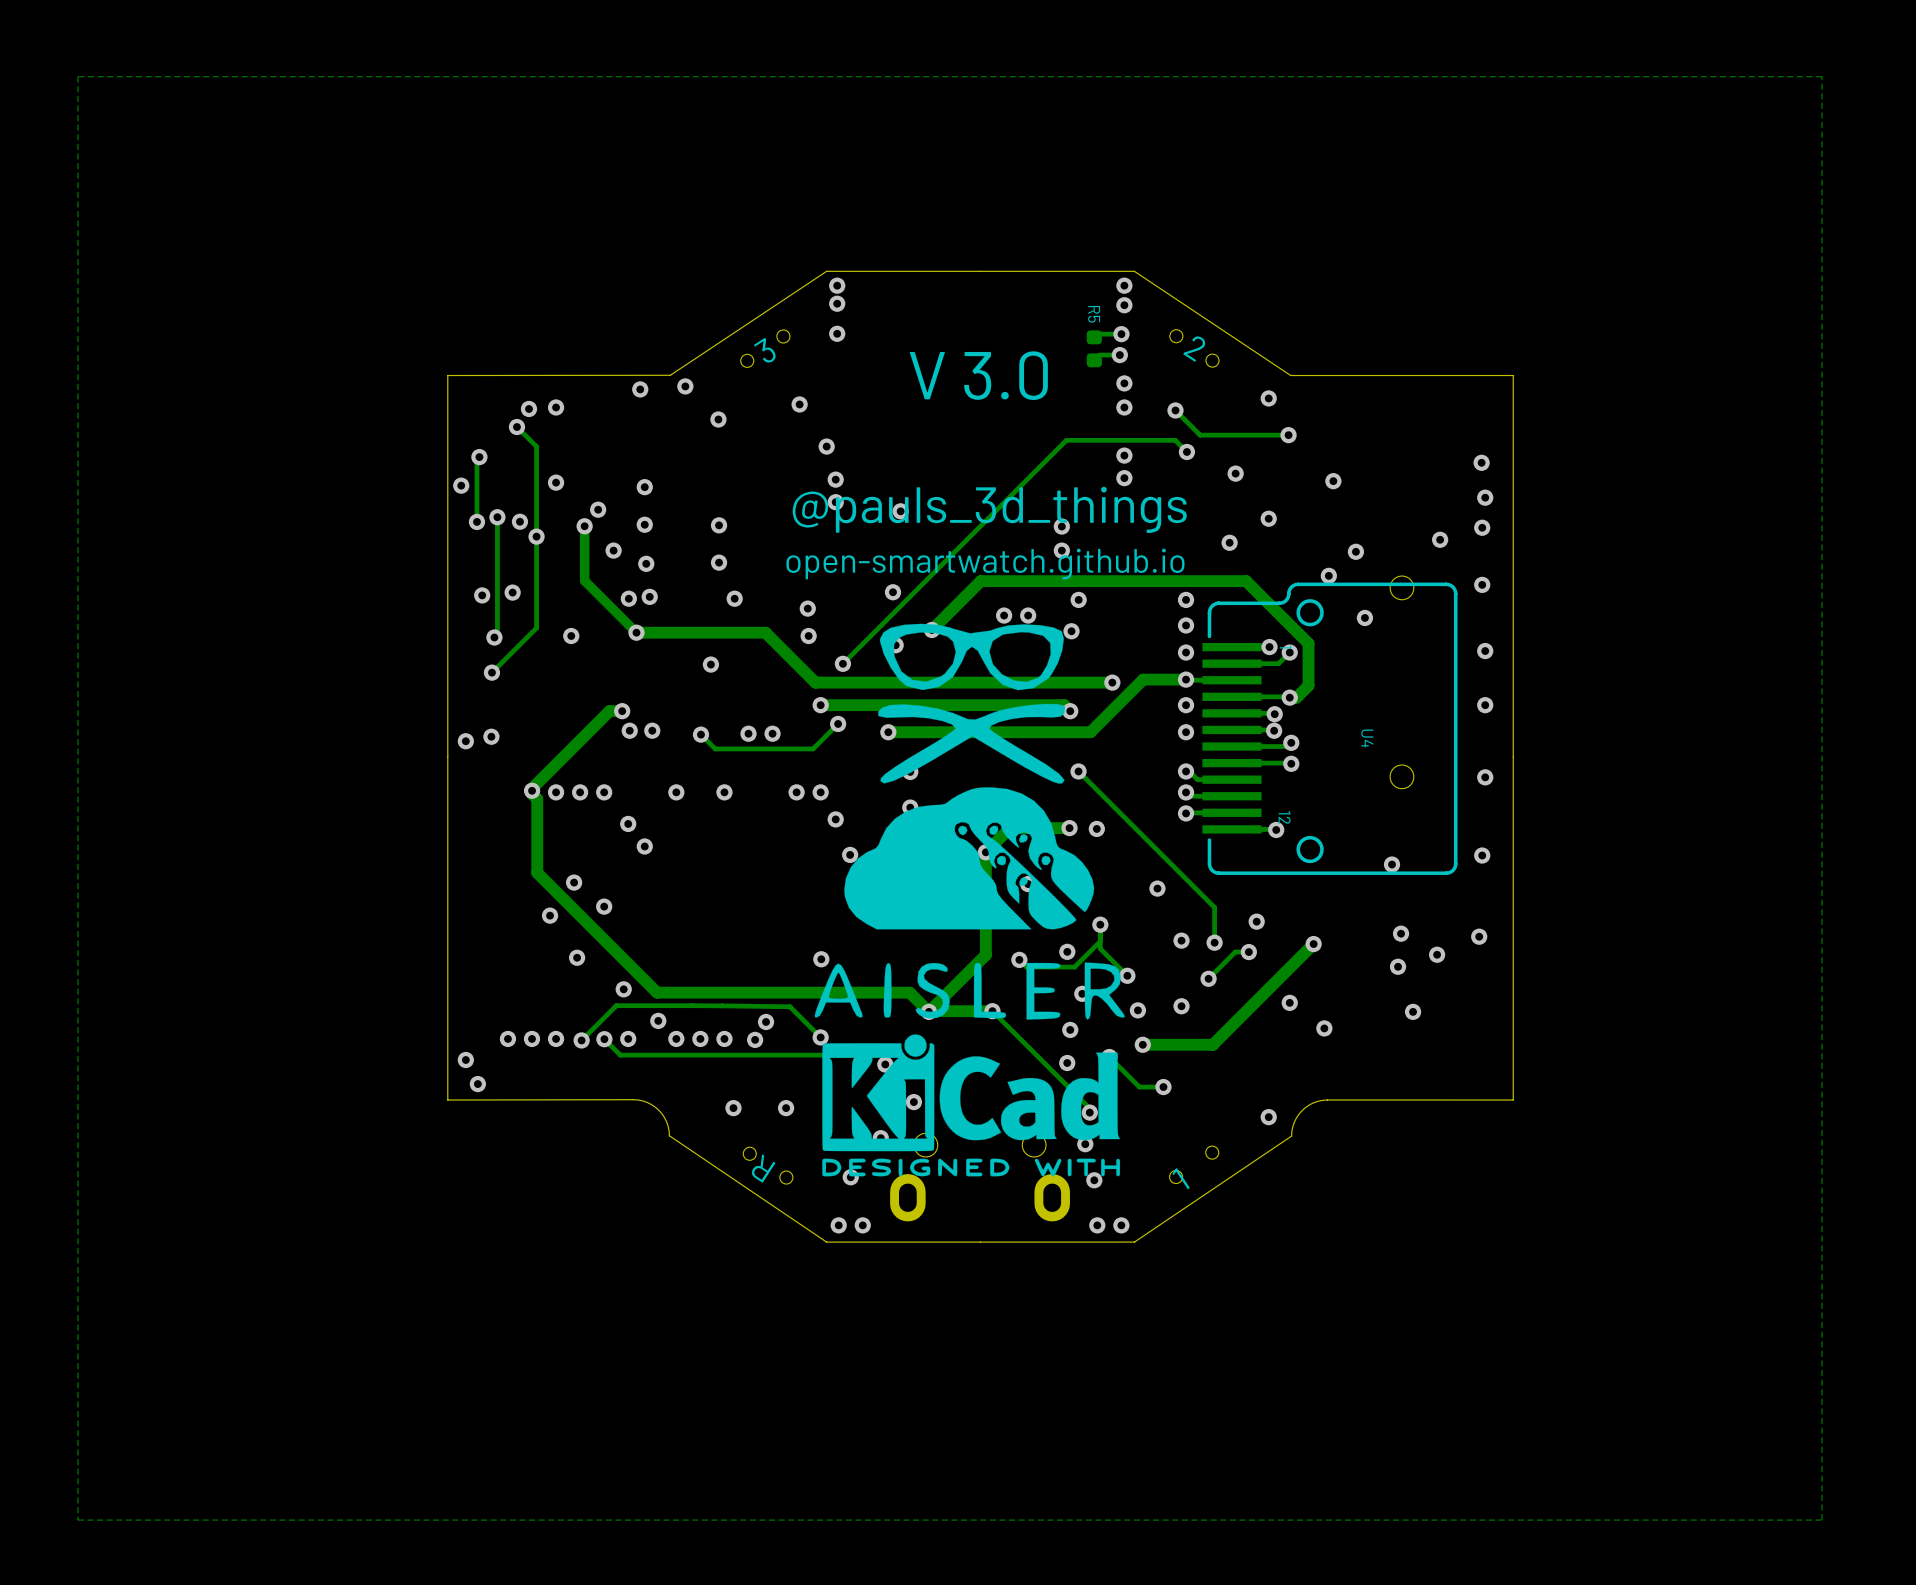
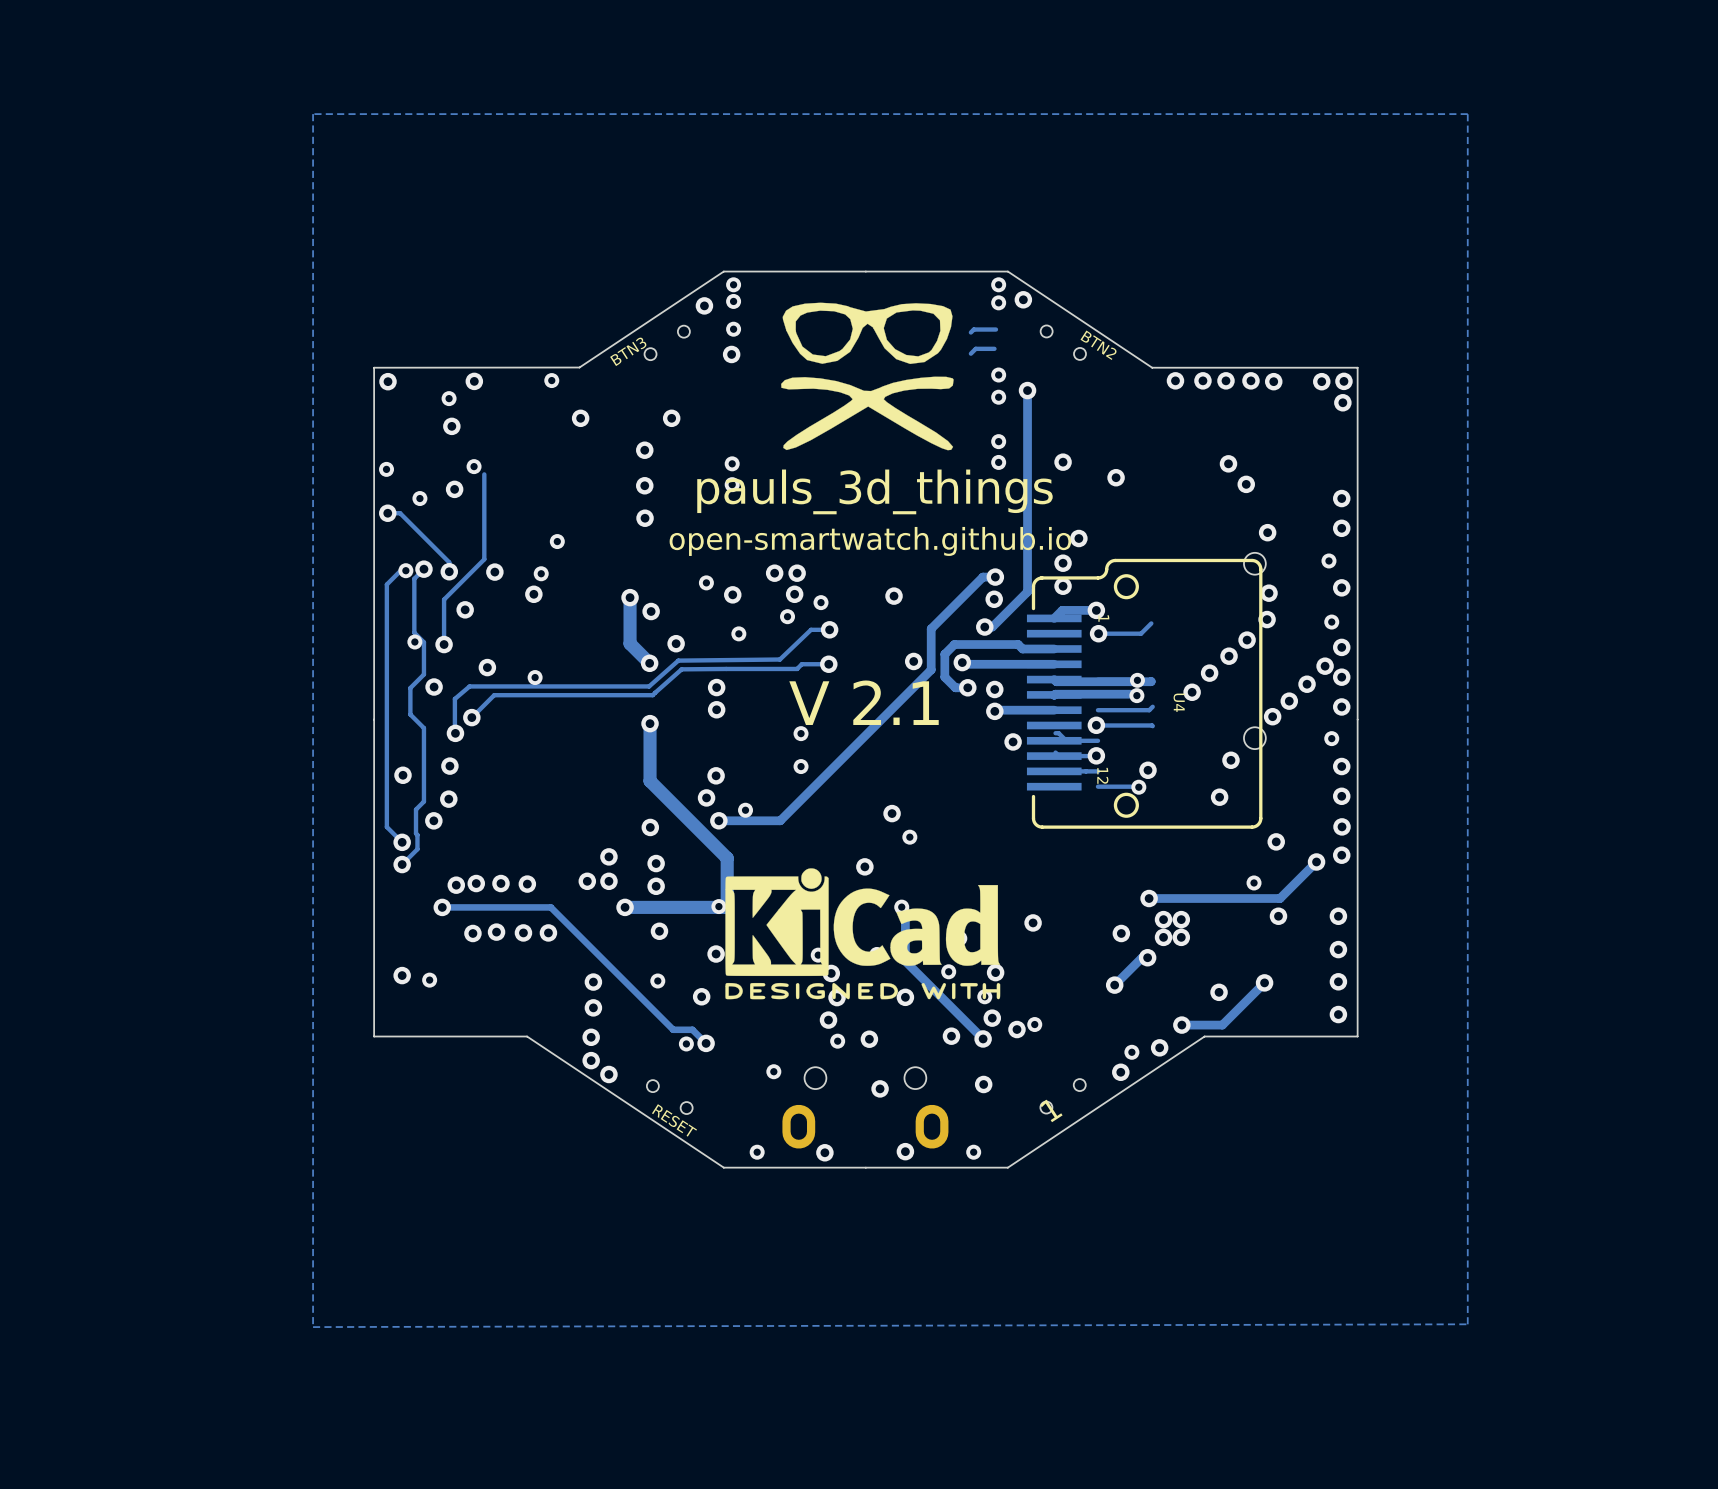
zone outline: (1822, 76) (1822, 1520) (77, 1520) (77, 76) (1822, 76) -> (1467, 114) (1467, 1324) (313, 1327) (313, 114) (1467, 114)
via: none -> (1023, 299)
via: none -> (704, 305)
via: (1121, 334) -> none
R5: (1094, 348) -> none
text: 2 (1194, 349) -> none
text: 3 (764, 350) -> none
text: none -> BTN2 (1098, 345)
via: (1119, 355) -> none
text: none -> BTN3 (628, 351)
via: none -> (731, 354)
text: V 3.0 (978, 375) -> none
via: (685, 386) -> none
via: none -> (1175, 380)
via: none -> (1202, 380)
via: none -> (1225, 380)
via: none -> (1250, 380)
via: none -> (388, 381)
via: none -> (1273, 381)
via: none -> (1321, 381)
via: none -> (1343, 381)
via: (1268, 398) -> none
track: none -> (1027, 390) (1027, 591) (992, 627) (984, 627)
via: none -> (1027, 390)
via: (799, 404) -> none
via position: (556, 407) -> (474, 381)
track: (1175, 410) (1200, 435) (1288, 435) -> none
via: (1175, 410) -> none
via: none -> (1342, 402)
via: (718, 419) -> none
track: (516, 427) (536, 446) (536, 628) (491, 672) -> none
via position: (516, 427) -> (451, 426)
via: none -> (580, 418)
via: none -> (671, 418)
via: (1288, 435) -> none
via: (826, 446) -> none
track: (1186, 451) (1175, 440) (1066, 440) (842, 663) -> none
via: (1186, 451) -> none
track: (479, 457) (476, 459) (476, 521) -> none
via: (479, 457) -> none
via: (1481, 462) -> none
via: none -> (644, 450)
via: (1235, 473) -> none
via: none -> (1063, 462)
via: none -> (1228, 463)
via: (1333, 481) -> none
via: (644, 487) -> none
track: none -> (484, 474) (484, 559) (444, 599) (444, 644)
via: none -> (1116, 477)
via: (1485, 497) -> none
via: none -> (1246, 484)
via: none -> (644, 485)
via: (598, 509) -> none
text: @pauls_3d_things (989, 509) -> pauls_3d_things (874, 491)
via: (900, 511) -> none
track: (497, 517) (497, 634) (494, 637) -> none
via: (1268, 518) -> none
via position: (476, 521) -> (387, 513)
via position: (519, 521) -> (454, 489)
via: (644, 524) -> none
via: (719, 525) -> none
track: (584, 526) (584, 580) (636, 632) (765, 632) (815, 682) (1112, 682) -> none
via: (584, 526) -> none
via: (1061, 526) -> none
via position: (1482, 527) -> (1341, 498)
track: none -> (387, 513) (400, 513) (449, 562) (449, 571)
via: (536, 536) -> none
via: none -> (645, 518)
via: (1440, 539) -> none
via: (1229, 542) -> none
via: none -> (1341, 528)
via: (613, 550) -> none
via: (1061, 550) -> none
via: (1355, 551) -> none
via: none -> (1267, 532)
via: none -> (1078, 538)
via: (719, 562) -> none
via: (1328, 575) -> none
via: none -> (1063, 563)
via: (512, 592) -> none
via: (892, 592) -> none
track: none -> (402, 569) (386, 584) (386, 827) (402, 842)
track: none -> (423, 569) (414, 578) (414, 632) (423, 642) (423, 674) (410, 688) (410, 714) (423, 728) (423, 801) (416, 809) (417, 849) (402, 864)
via: none -> (423, 569)
via: none -> (449, 571)
via: none -> (494, 572)
via: (649, 596) -> none
via: (734, 598) -> none
via: none -> (774, 573)
via: none -> (797, 573)
via: (1078, 599) -> none
via: (1186, 599) -> none
track: none -> (995, 577) (982, 577) (931, 628) (931, 669) (780, 820) (718, 820)
via: none -> (995, 577)
via: none -> (1063, 586)
via: none -> (1341, 587)
via: (1004, 615) -> none
via: (1028, 615) -> none
via: (1364, 617) -> none
via: none -> (1269, 593)
via: none -> (794, 594)
via: none -> (732, 594)
via: none -> (894, 596)
track: none -> (630, 597) (630, 643) (649, 663)
via: none -> (630, 597)
via: (1186, 625) -> none
via: none -> (994, 599)
track: (931, 629) (980, 581) (1246, 581) (1308, 643) (1308, 685) (1296, 697) (1231, 696) -> none
via: (1071, 631) -> none
via position: (636, 632) -> (533, 594)
via: (571, 636) -> none
via: (808, 636) -> none
via: (494, 637) -> none
via: none -> (465, 609)
track: none -> (1096, 610) (1062, 610) (1054, 618)
via: none -> (1096, 610)
via: none -> (651, 611)
via: (1269, 647) -> none
via: none -> (1267, 619)
via: (1186, 652) -> none
via: (1289, 652) -> none
via: none -> (984, 627)
track: none -> (829, 629) (811, 629) (779, 659) (678, 660) (649, 686) (469, 686) (454, 698) (455, 733)
via: none -> (829, 629)
via: none -> (1098, 633)
via: (710, 664) -> none
via: none -> (1247, 640)
via: none -> (676, 643)
via: none -> (444, 644)
via: none -> (1341, 647)
via: (1186, 679) -> none
track: none -> (1054, 649) (1022, 649) (1018, 644) (954, 644) (944, 654) (944, 677) (955, 687) (967, 687)
track: (1231, 680) (1143, 679) (1090, 732) (888, 732) -> none
via: (1112, 682) -> none
via: none -> (1229, 656)
via: none -> (913, 661)
track: none -> (962, 662) (964, 664) (1054, 664)
via: none -> (649, 663)
track: none -> (828, 664) (801, 664) (797, 668) (681, 669) (652, 695) (494, 695) (471, 717)
via: none -> (828, 664)
via: (1289, 697) -> none
via: none -> (1325, 666)
via: none -> (487, 667)
drawing position: (971, 703) -> (867, 376)
track: (820, 705) (1064, 705) (1070, 711) -> none
via position: (820, 705) -> (716, 687)
via: (1186, 705) -> none
via: (1485, 705) -> none
via: none -> (1209, 673)
via: none -> (1341, 677)
track: (622, 711) (609, 711) (532, 788) (532, 793) (537, 799) (537, 872) (657, 992) (909, 992) (928, 1011) (985, 954) (985, 852) (1010, 828) (1069, 828) -> none
via position: (1070, 711) -> (962, 662)
track: none -> (1054, 679) (1056, 681) (1151, 681)
via: none -> (1307, 684)
via: none -> (434, 687)
via: none -> (967, 687)
track: (838, 723) (813, 748) (715, 748) (701, 734) -> none
via: (838, 723) -> none
via: none -> (994, 689)
via: none -> (1192, 692)
U4 position: (1329, 728) -> (1144, 693)
track: none -> (1135, 694) (1054, 695)
via: (629, 730) -> none
via: (652, 730) -> none
via: (888, 732) -> none
via: (1186, 732) -> none
via: (748, 733) -> none
via: (772, 733) -> none
via: (701, 734) -> none
via: (491, 736) -> none
via: none -> (1289, 701)
text: none -> V 2.1 (864, 702)
via: (465, 741) -> none
via: (1291, 742) -> none
via: none -> (1341, 706)
via: none -> (716, 709)
track: none -> (1054, 710) (994, 711)
via: none -> (994, 711)
via: none -> (1272, 716)
via: none -> (471, 717)
track: none -> (650, 723) (650, 781) (727, 858) (727, 907) (625, 907)
via: none -> (650, 723)
via: none -> (1096, 725)
via: (1291, 763) -> none
via: none -> (455, 733)
track: (1078, 771) (1214, 907) (1214, 942) -> none
via: (1078, 771) -> none
via: (1186, 771) -> none
via: none -> (1013, 741)
drawing: [814, 787, 1125, 1020] -> none
via position: (532, 790) -> (449, 766)
via: (556, 792) -> none
via: (580, 792) -> none
via: (604, 792) -> none
via: (676, 792) -> none
via: (724, 792) -> none
via: (796, 792) -> none
via: (820, 792) -> none
via: (1186, 792) -> none
via: none -> (1096, 755)
via: none -> (1230, 760)
via: none -> (1341, 766)
via: none -> (1147, 770)
via: (1186, 813) -> none
via: none -> (402, 775)
via position: (835, 819) -> (716, 775)
via: (628, 823) -> none
via: (1069, 828) -> none
via: (1096, 828) -> none
via: none -> (1341, 796)
via: none -> (1219, 797)
via: none -> (706, 797)
via: none -> (448, 799)
via: (644, 846) -> none
via: (985, 852) -> none
via: (1482, 855) -> none
via: none -> (892, 813)
via: (1392, 864) -> none
via: none -> (433, 820)
via: none -> (718, 820)
via: none -> (1342, 826)
via: none -> (650, 827)
via: (574, 882) -> none
via: (1157, 888) -> none
via: none -> (402, 842)
via: none -> (1276, 841)
via: none -> (1341, 855)
via: none -> (608, 856)
via: (604, 906) -> none
track: none -> (1316, 861) (1280, 898) (1149, 898)
via: none -> (1316, 861)
via: none -> (656, 863)
via: none -> (402, 864)
via: (550, 915) -> none
via: none -> (864, 866)
via: (1256, 921) -> none
track: (1100, 924) (1100, 948) (1127, 975) -> none
via: (1100, 924) -> none
via: none -> (587, 881)
via: none -> (608, 881)
via: none -> (476, 883)
via: none -> (500, 883)
via: none -> (527, 884)
via: none -> (456, 885)
via: (1479, 936) -> none
via: none -> (656, 886)
via: (1181, 940) -> none
track: (1100, 941) (1074, 967) (1026, 967) (1019, 959) -> none
via: (1214, 942) -> none
track: (1313, 944) (1212, 1044) (1142, 1044) -> none
via: (1313, 944) -> none
via: none -> (1149, 898)
via: (1067, 951) -> none
track: (1248, 952) (1235, 952) (1208, 978) -> none
via: (1248, 952) -> none
via position: (1437, 954) -> (1278, 916)
via: (577, 957) -> none
track: none -> (442, 907) (550, 907) (673, 1029) (692, 1029) (706, 1043)
via: none -> (442, 907)
via: none -> (625, 907)
track: none -> (905, 910) (905, 961) (983, 1038)
via: (1398, 966) -> none
via: none -> (1338, 916)
via: none -> (1163, 919)
via: none -> (1181, 919)
via: (1127, 975) -> none
via: none -> (1033, 922)
via: (1208, 978) -> none
via: none -> (496, 932)
via: none -> (659, 931)
via: none -> (523, 932)
via: none -> (548, 932)
via: none -> (472, 933)
via: none -> (1121, 933)
via: (623, 989) -> none
via: none -> (1163, 937)
via: none -> (1181, 937)
via: (1289, 1002) -> none
via: none -> (1338, 949)
via: (1181, 1006) -> none
via: none -> (716, 954)
via: (1137, 1010) -> none
track: (929, 1011) (992, 1011) (1089, 1108) (1089, 1112) -> none
via: (1413, 1011) -> none
track: none -> (1147, 957) (1142, 957) (1114, 985)
via: none -> (1147, 957)
via: (658, 1020) -> none
via: (766, 1021) -> none
via: (1324, 1028) -> none
via: none -> (995, 972)
via: none -> (831, 973)
via: none -> (402, 975)
track: (820, 1037) (790, 1006) (616, 1005) (581, 1040) -> none
via: (820, 1037) -> none
via: (532, 1038) -> none
via: (556, 1038) -> none
via: (628, 1038) -> none
via: (676, 1038) -> none
via: (700, 1038) -> none
via: (724, 1038) -> none
track: (604, 1039) (620, 1055) (845, 1055) (853, 1046) (878, 1046) (885, 1053) (885, 1064) -> none
via: (604, 1039) -> none
via: (581, 1040) -> none
via: none -> (1338, 981)
via: none -> (593, 982)
track: none -> (1264, 982) (1222, 1025) (1181, 1025)
via: none -> (1264, 982)
via: (1142, 1044) -> none
via: none -> (1114, 985)
via: none -> (1219, 992)
via: none -> (701, 996)
track: (1109, 1056) (1139, 1087) (1163, 1087) -> none
via: none -> (837, 997)
via: none -> (905, 997)
via: (465, 1059) -> none
via: (1067, 1063) -> none
via: (885, 1064) -> none
via: none -> (593, 1007)
via: none -> (1338, 1014)
via: none -> (992, 1018)
via: none -> (828, 1020)
via: (477, 1084) -> none
via: none -> (1181, 1025)
via: none -> (1016, 1029)
board edge: (447, 1100) (633, 1099) (647, 1102) (655, 1107) (664, 1117) (669, 1135) (826, 1242) -> (374, 1036) (527, 1036) (723, 1167)
via: none -> (591, 1037)
board edge: (1513, 1100) (1327, 1099) (1313, 1102) (1305, 1107) (1296, 1118) (1291, 1136) (1134, 1242) -> (1357, 1036) (1204, 1036) (1007, 1167)
via: (913, 1102) -> none
via: none -> (869, 1039)
via: none -> (983, 1038)
drawing position: (971, 1105) -> (862, 933)
via: none -> (706, 1043)
via: (733, 1108) -> none
via position: (1089, 1112) -> (951, 1036)
via: none -> (1159, 1047)
via: none -> (591, 1060)
via: none -> (1120, 1072)
via: none -> (608, 1074)
via: (1085, 1144) -> none
via: none -> (983, 1084)
via: none -> (880, 1088)
text: R (763, 1168) -> none
via: (850, 1177) -> none
via: (1094, 1180) -> none
text: none -> RESET (674, 1120)
via: none -> (905, 1151)
via: (838, 1225) -> none
via: none -> (824, 1152)
via: (1121, 1225) -> none

